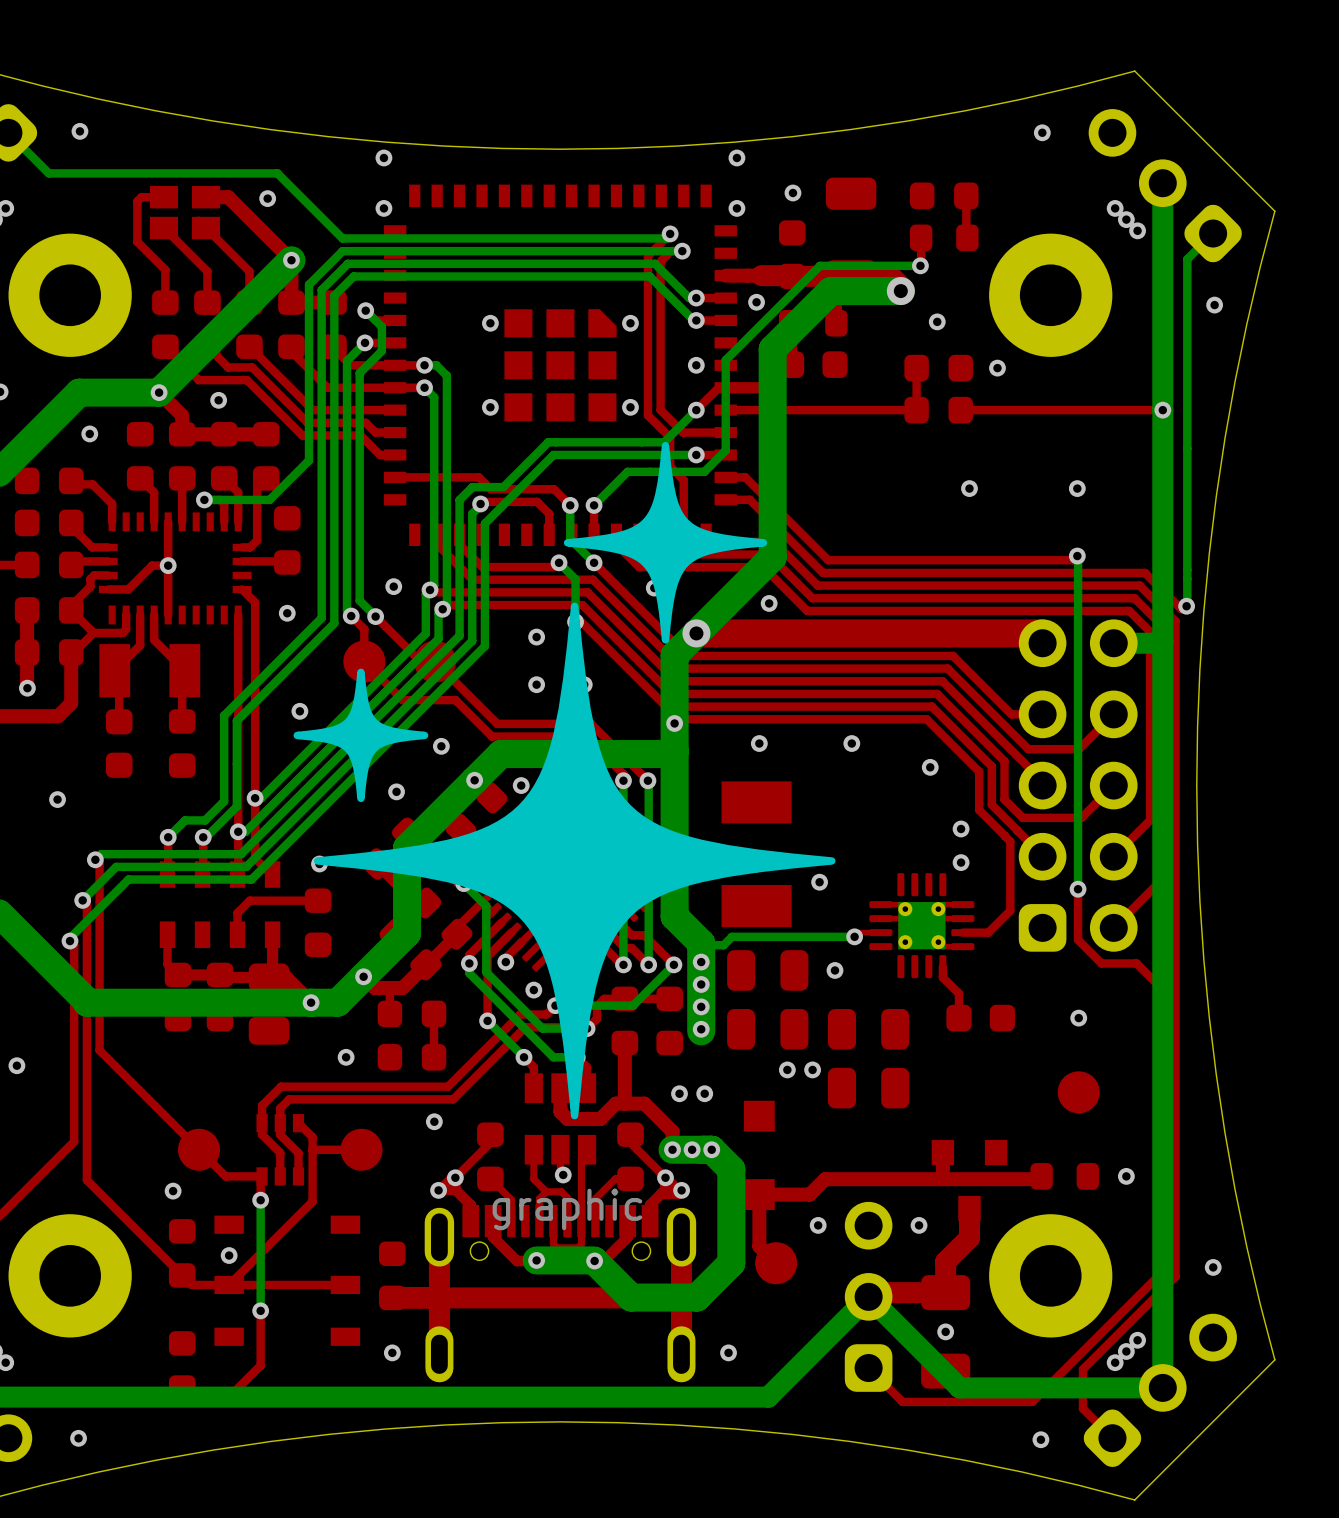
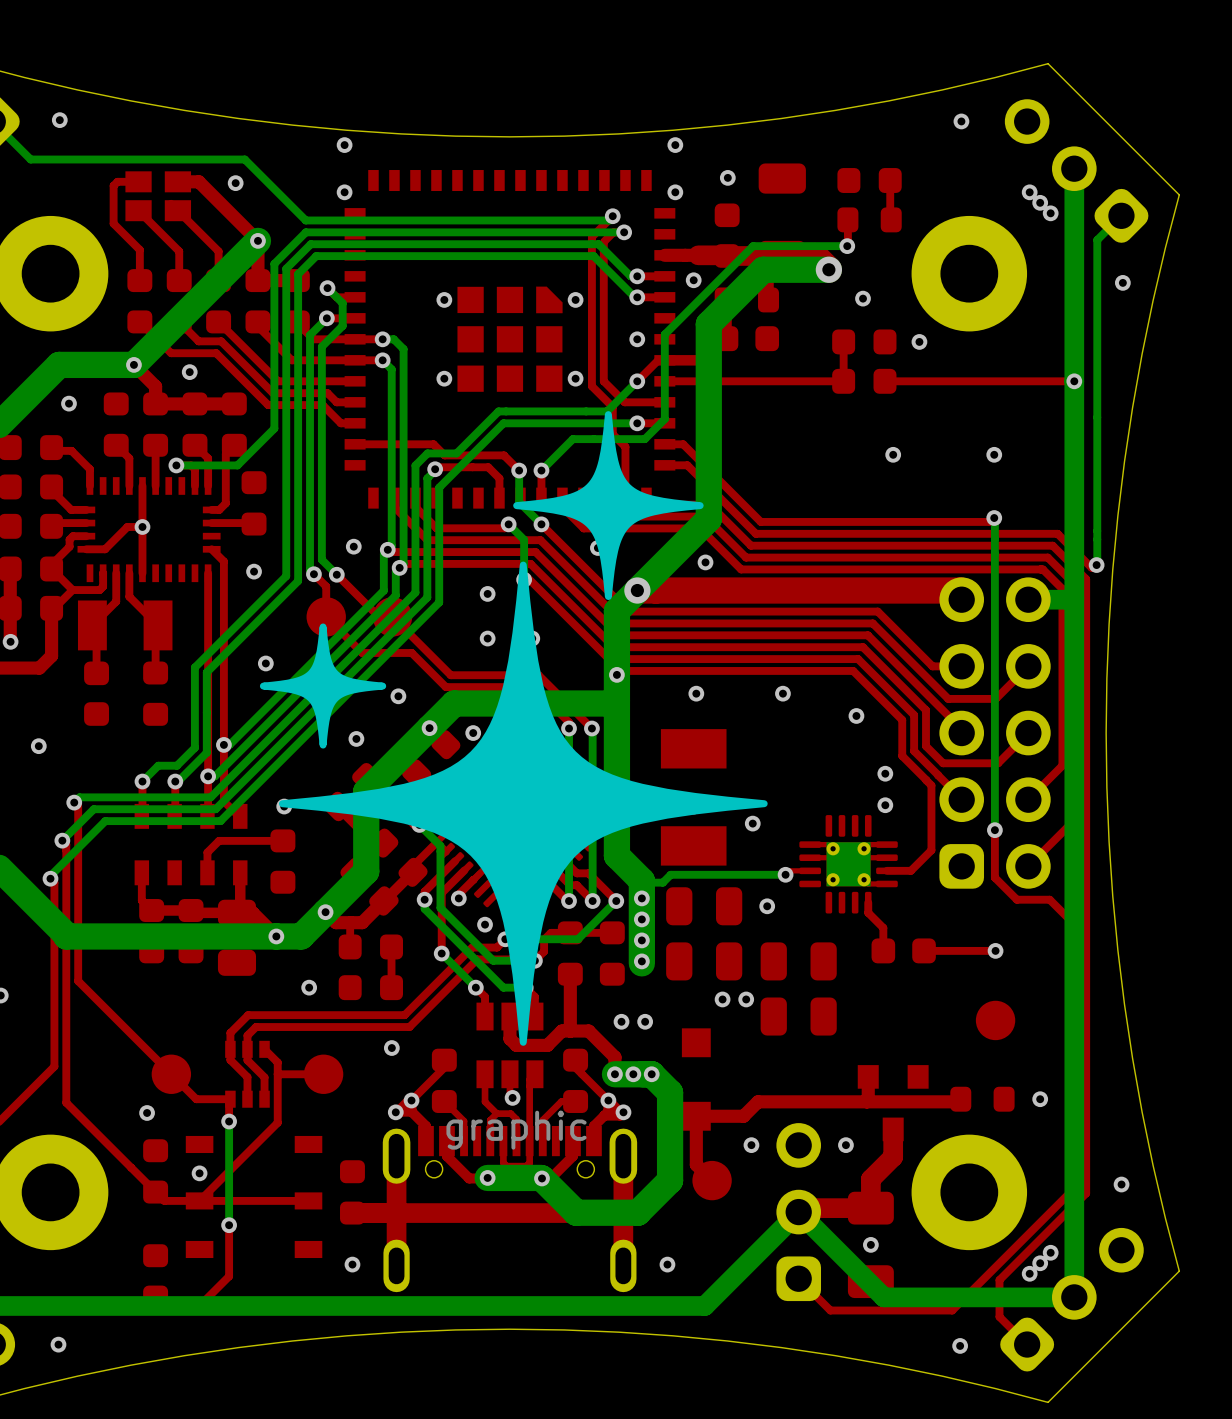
top track: none -> (995, 950) (924, 950)

